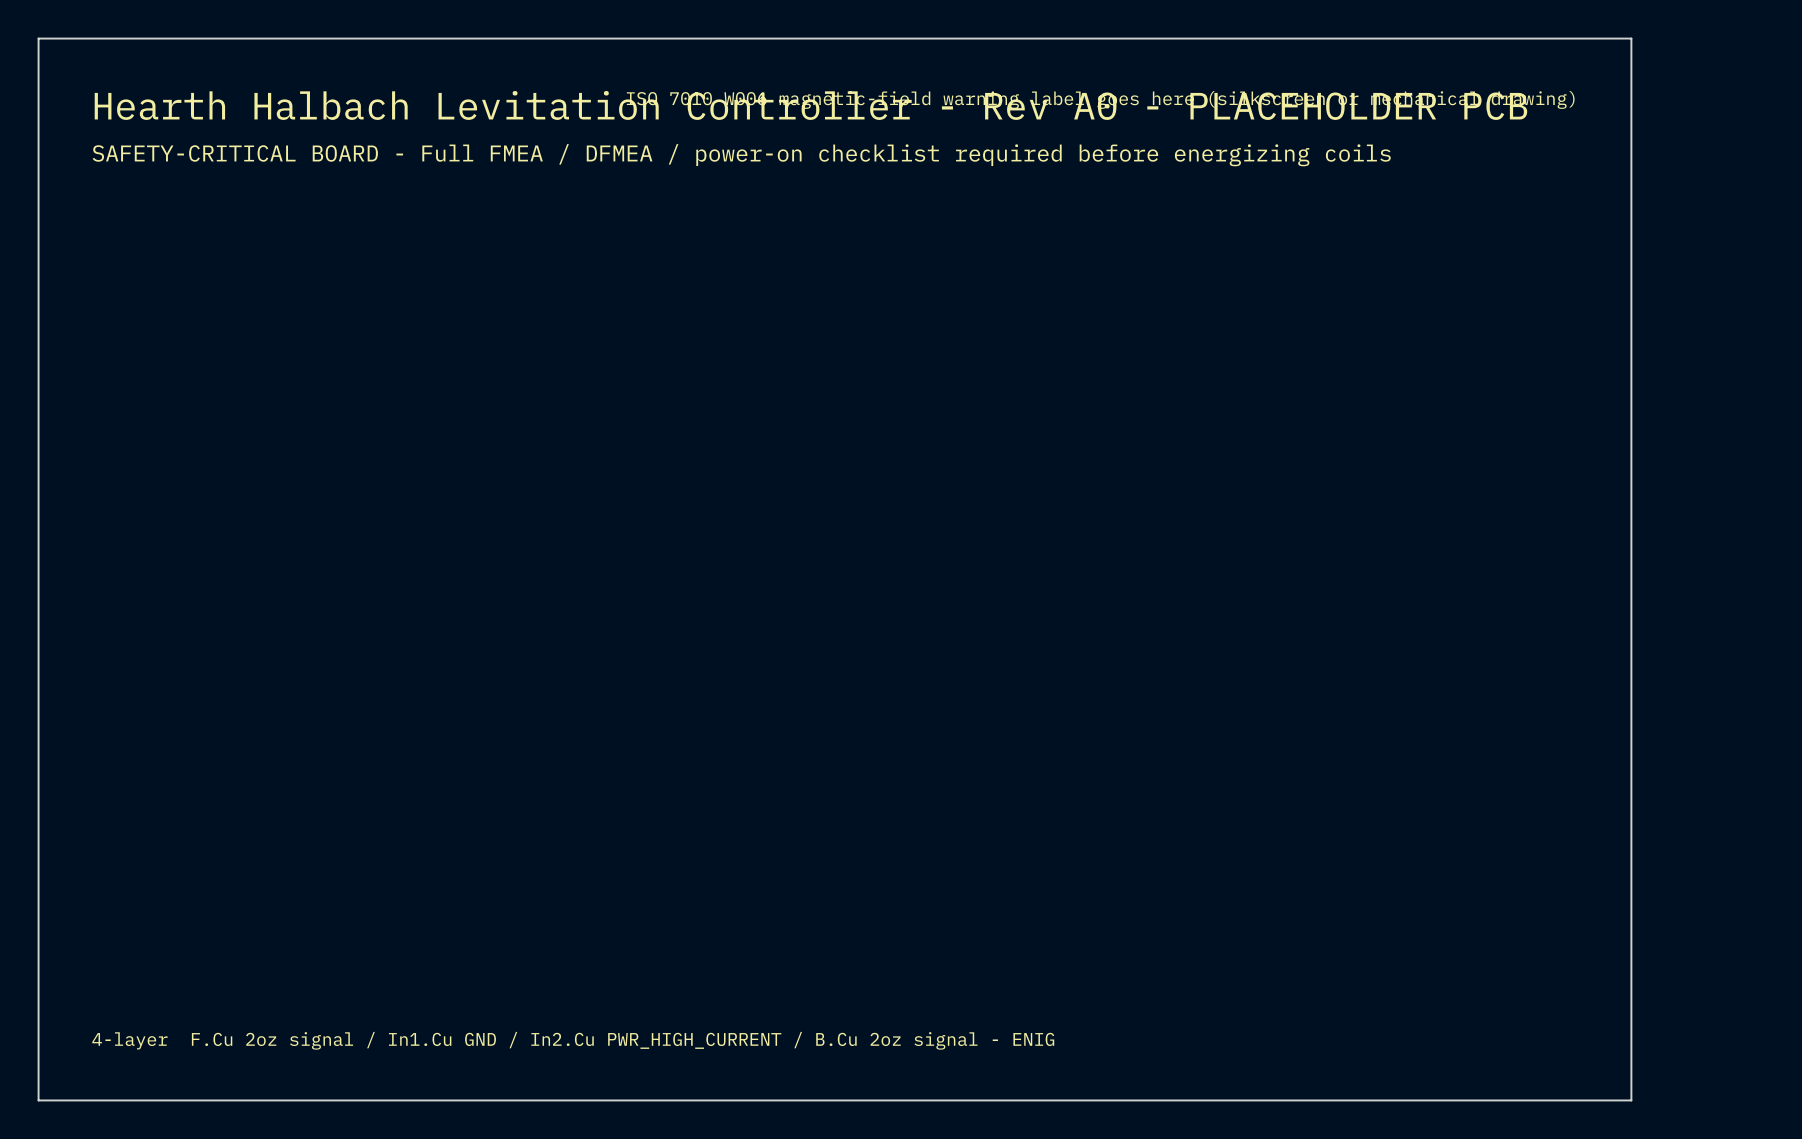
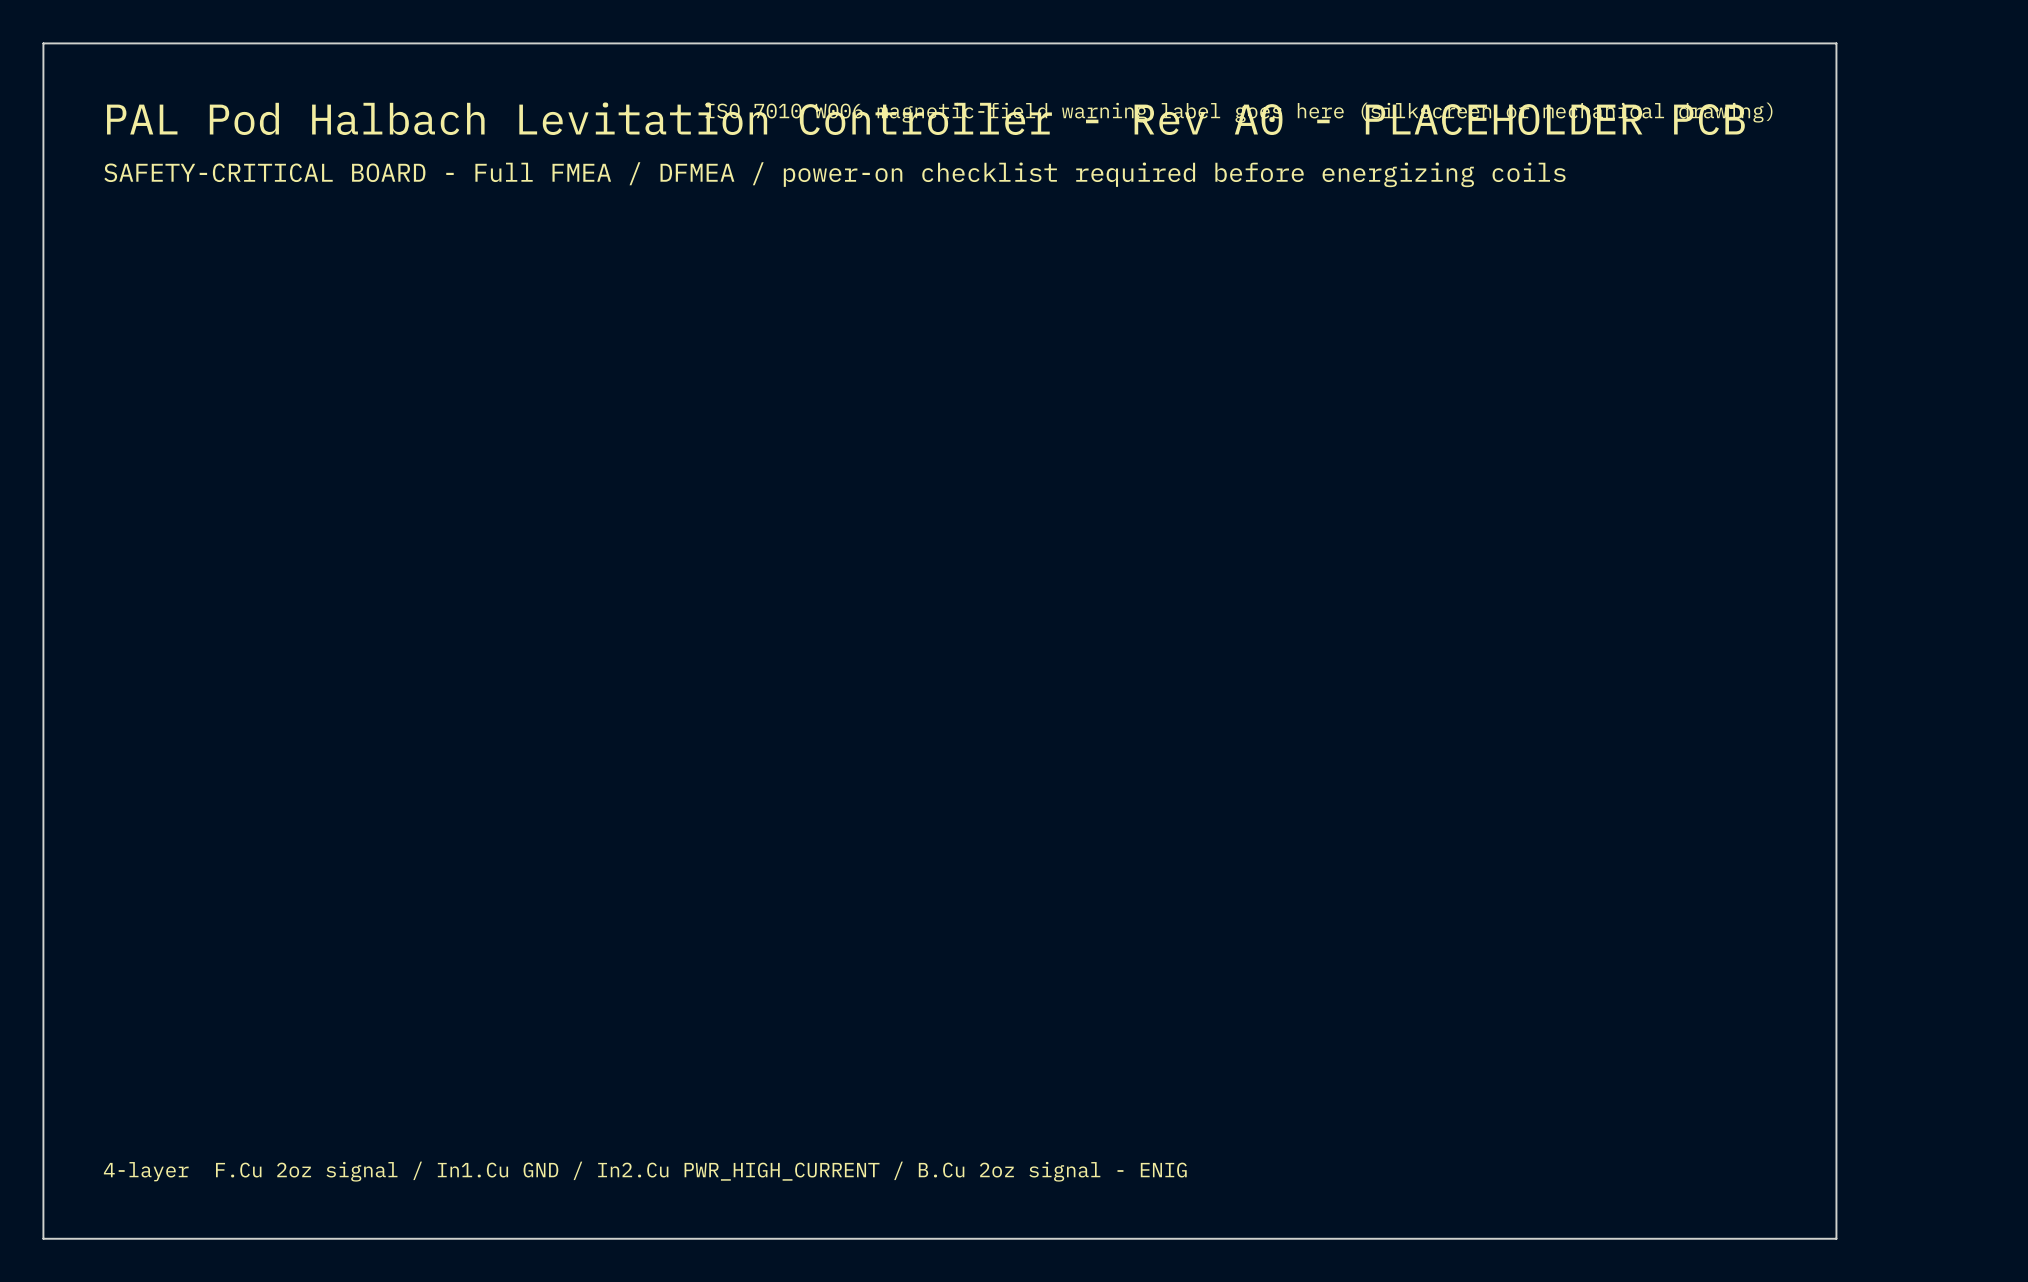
text: Hearth Halbach Levitation Controller - Rev A0 - PLACEHOLDER PCB (810, 105) -> PAL Pod Halbach Levitation Controller - Rev A0 - PLACEHOLDER PCB (925, 118)

